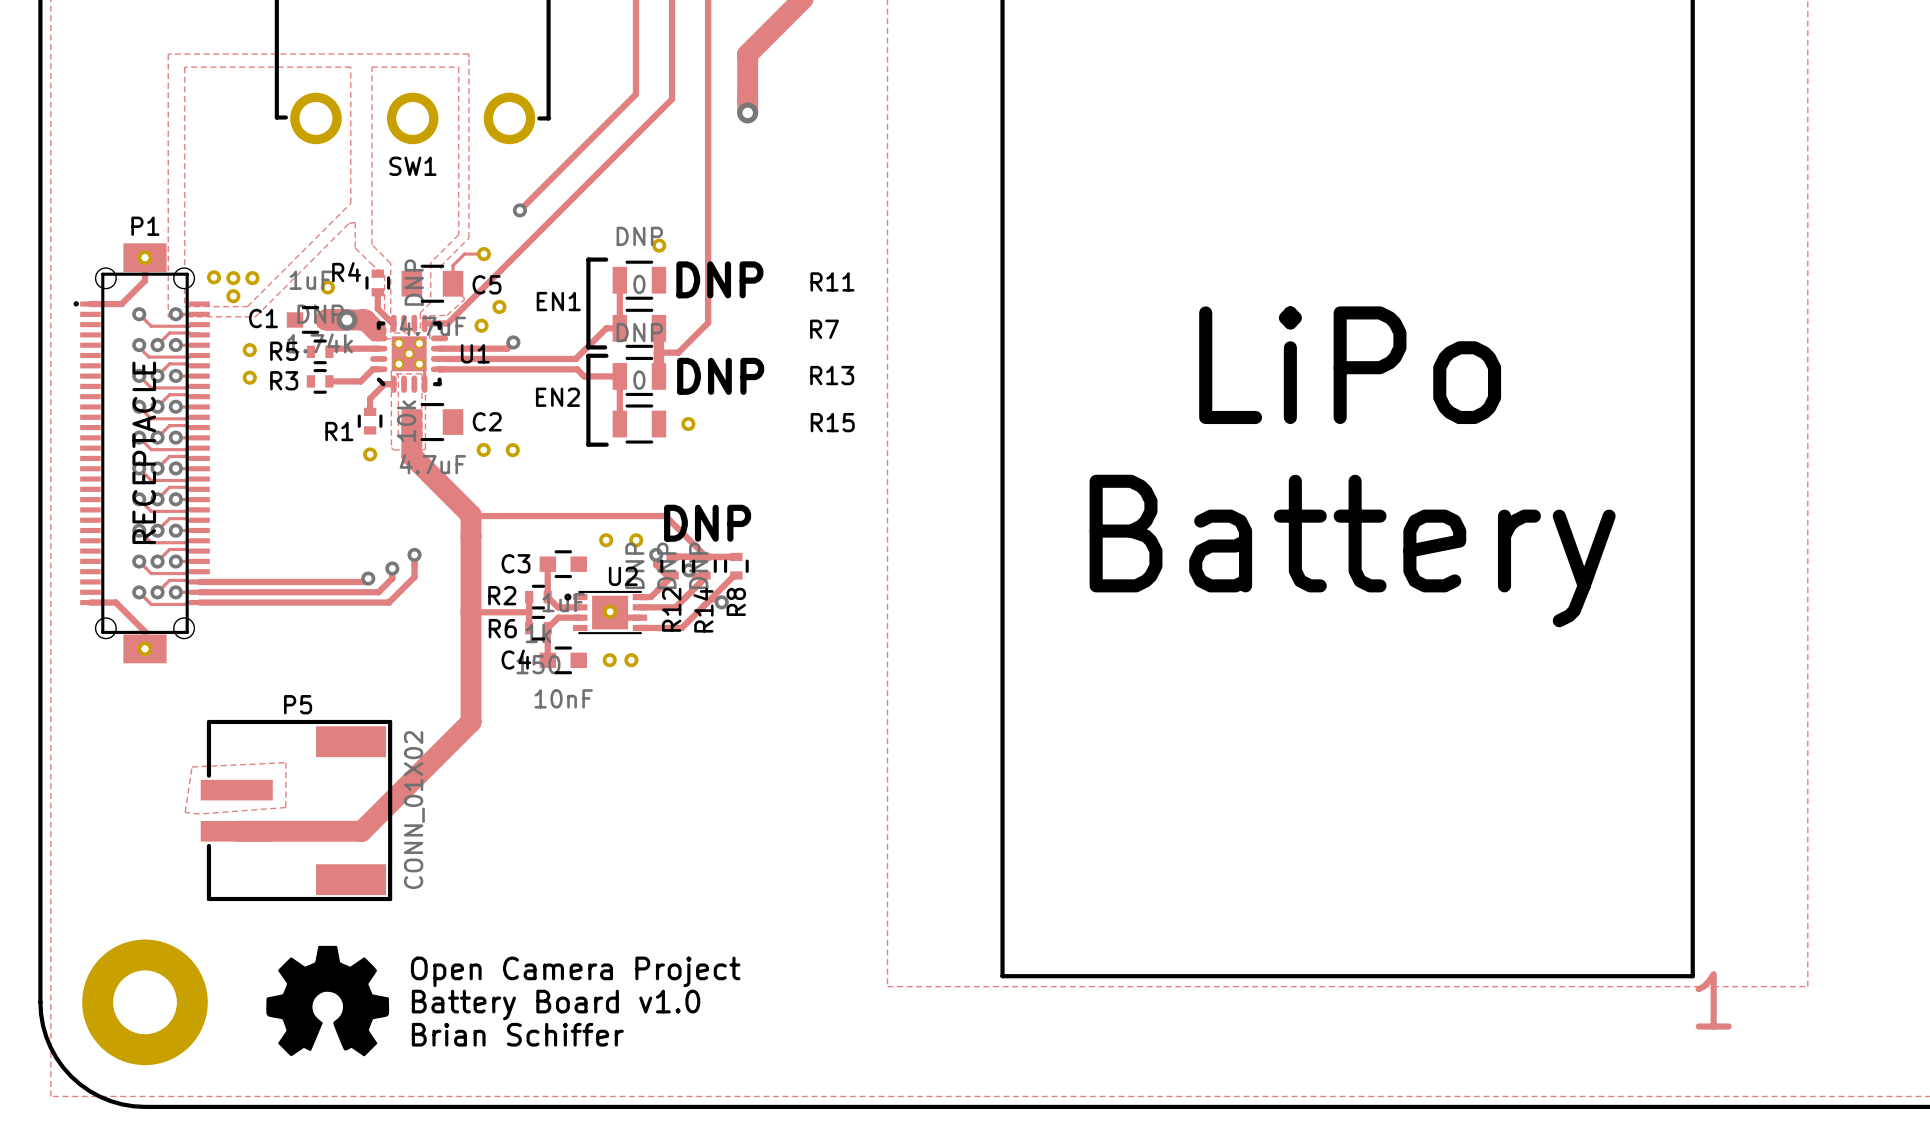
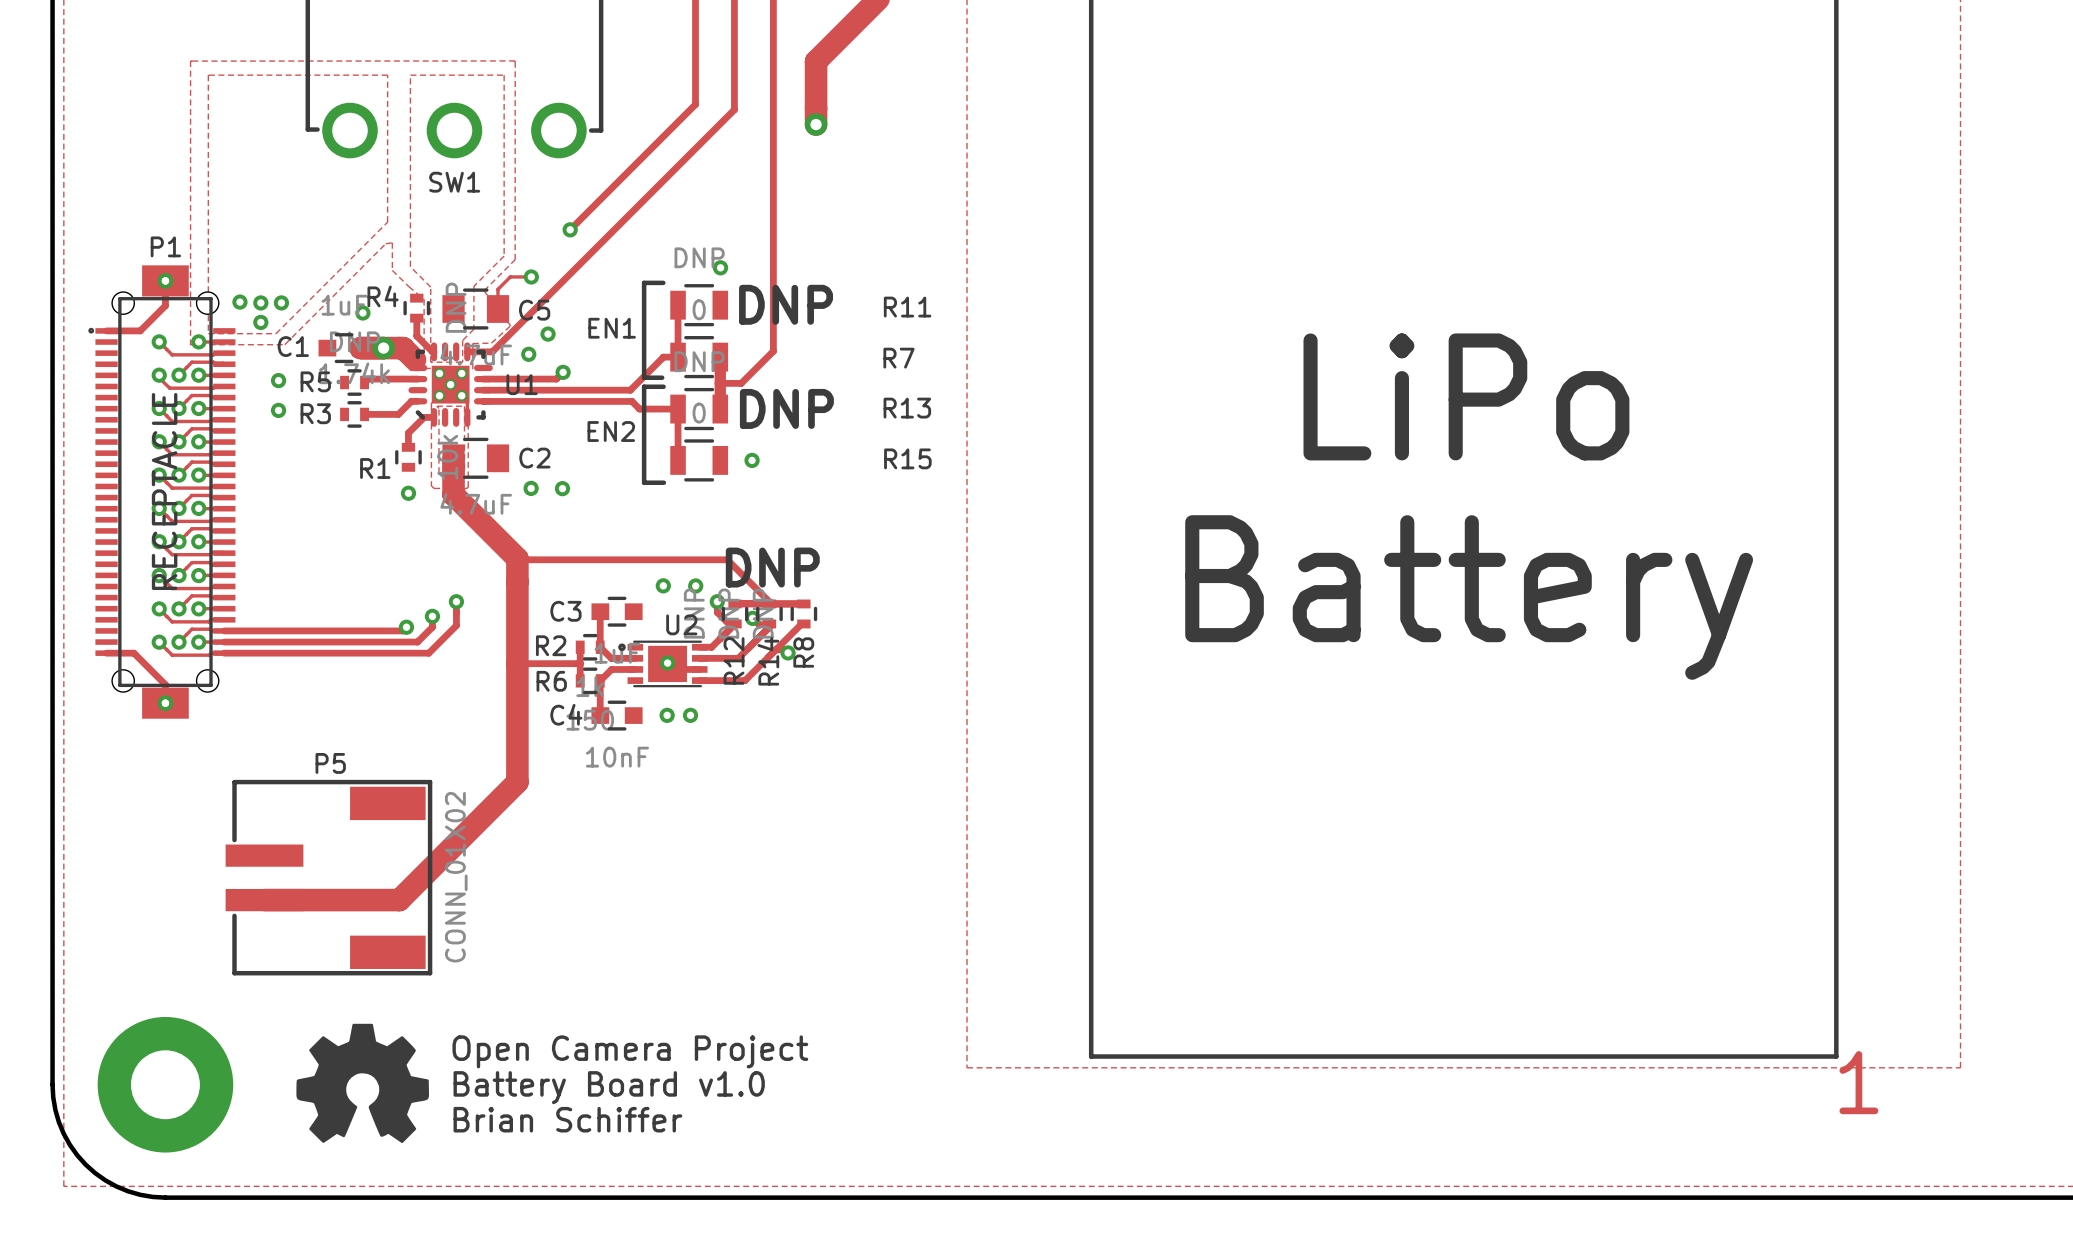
zone outline: (285, 762) (192, 767) (185, 812) (199, 813) (285, 807) (285, 762) -> none

